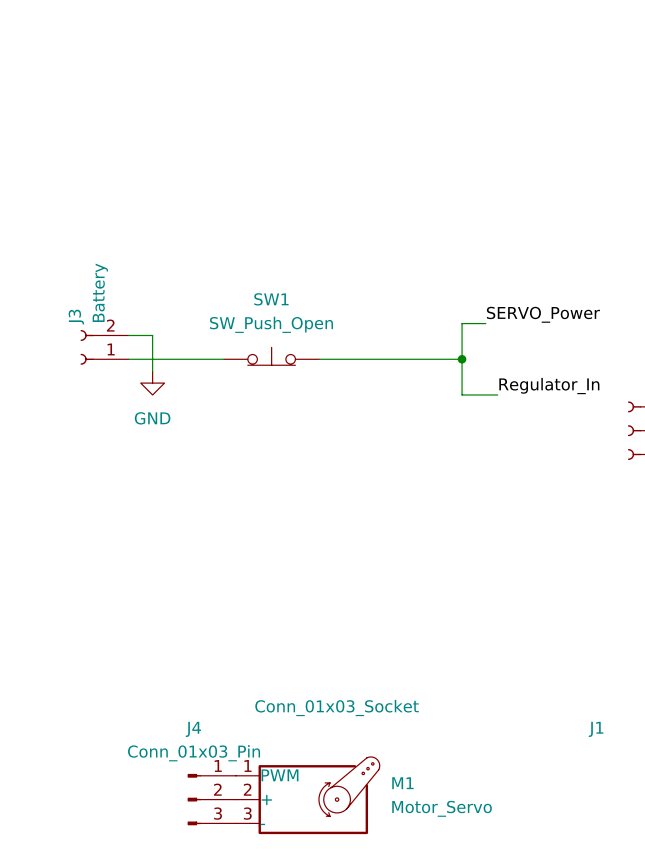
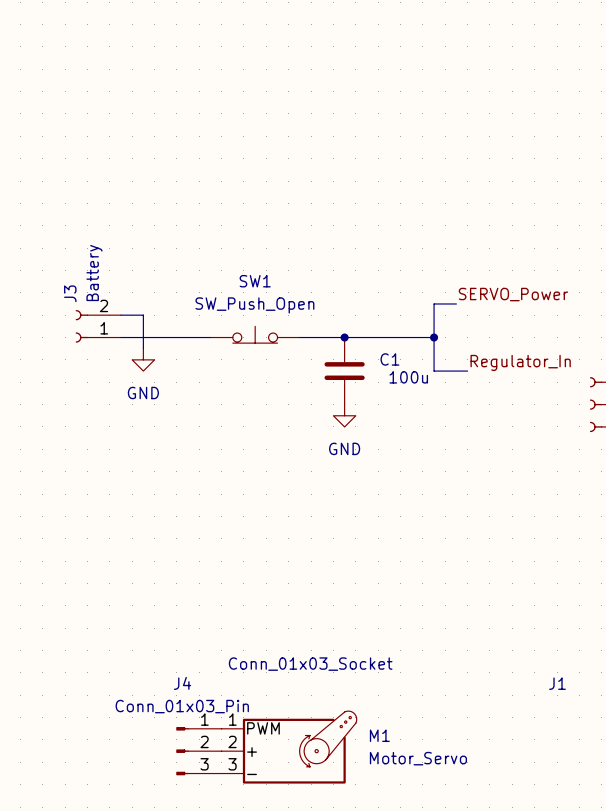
junction: none -> (344, 337)
C1: none -> 100u (344, 371)
power symbol: none -> GND (344, 415)

